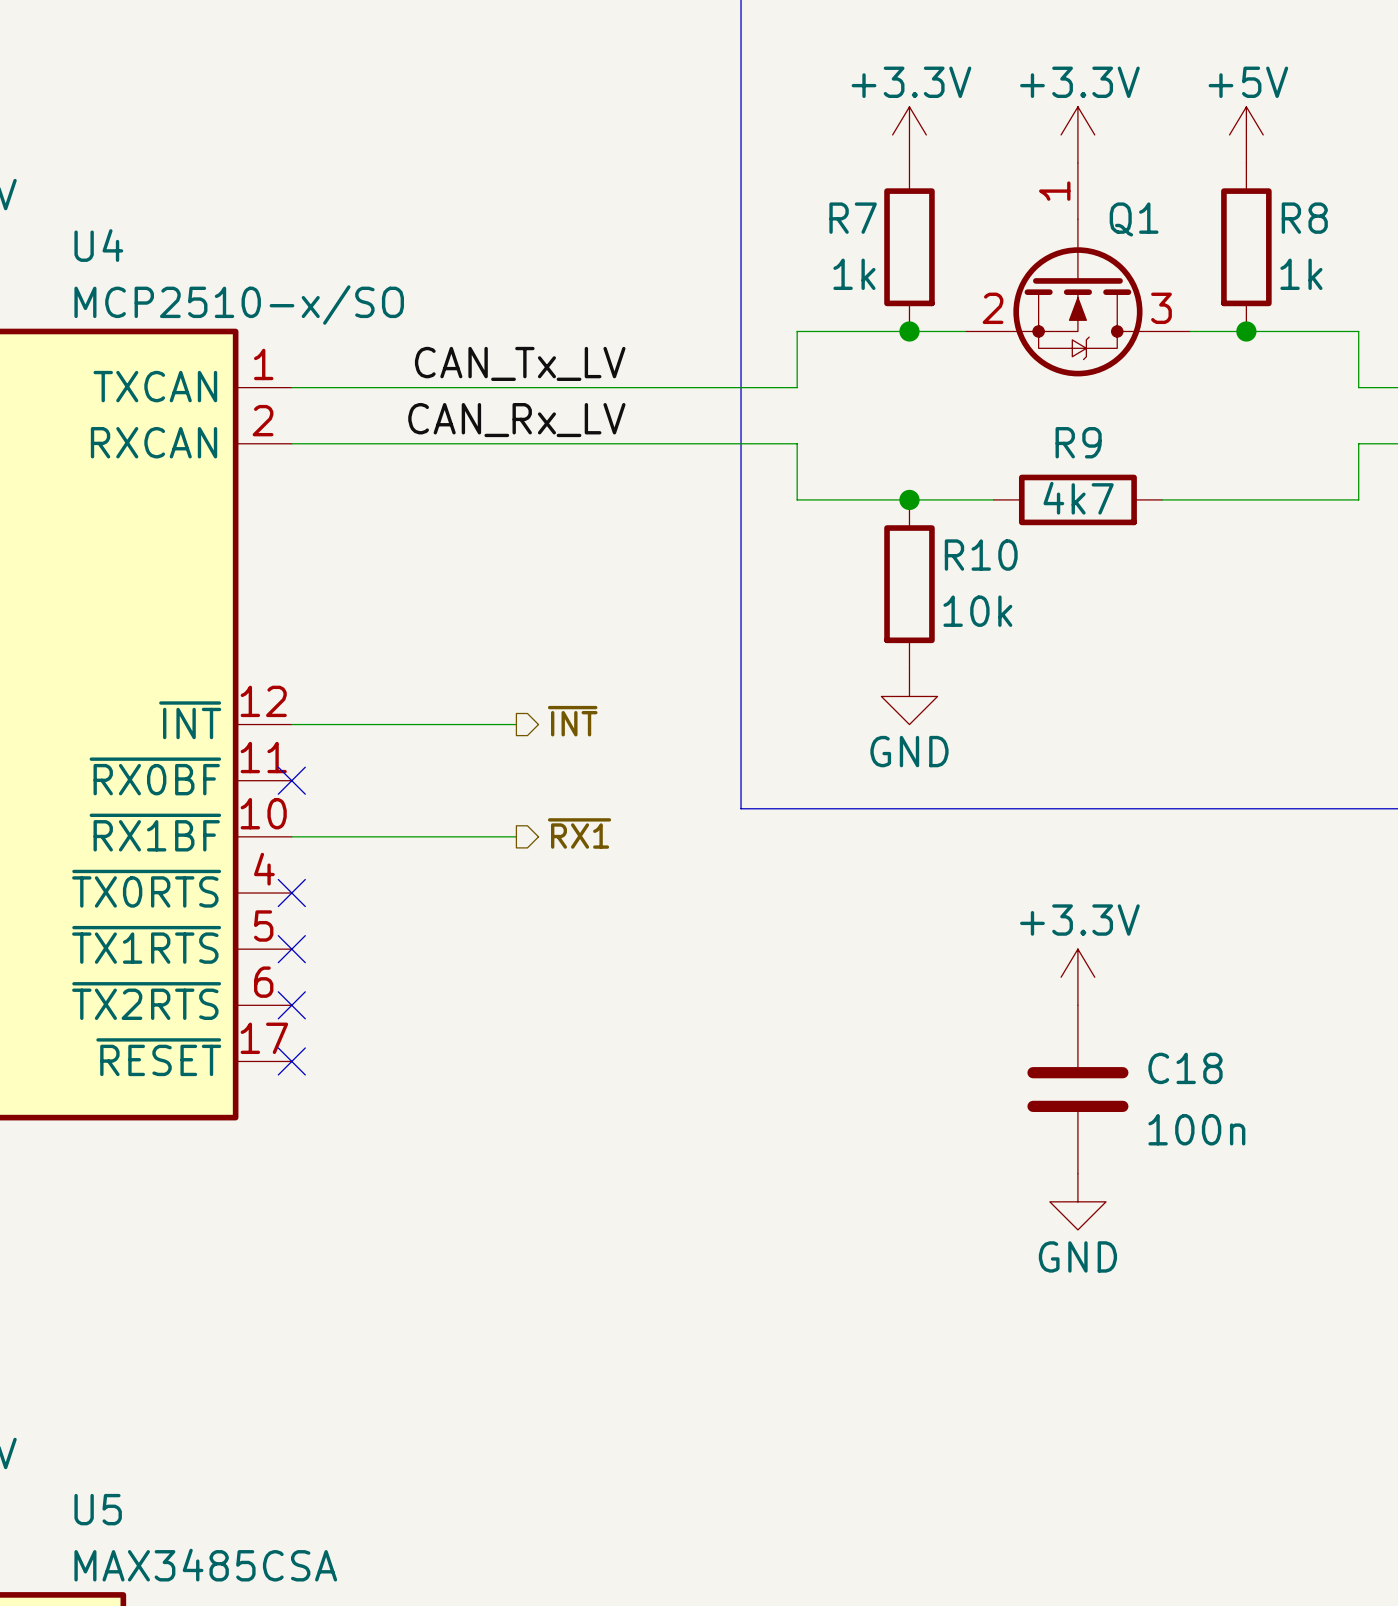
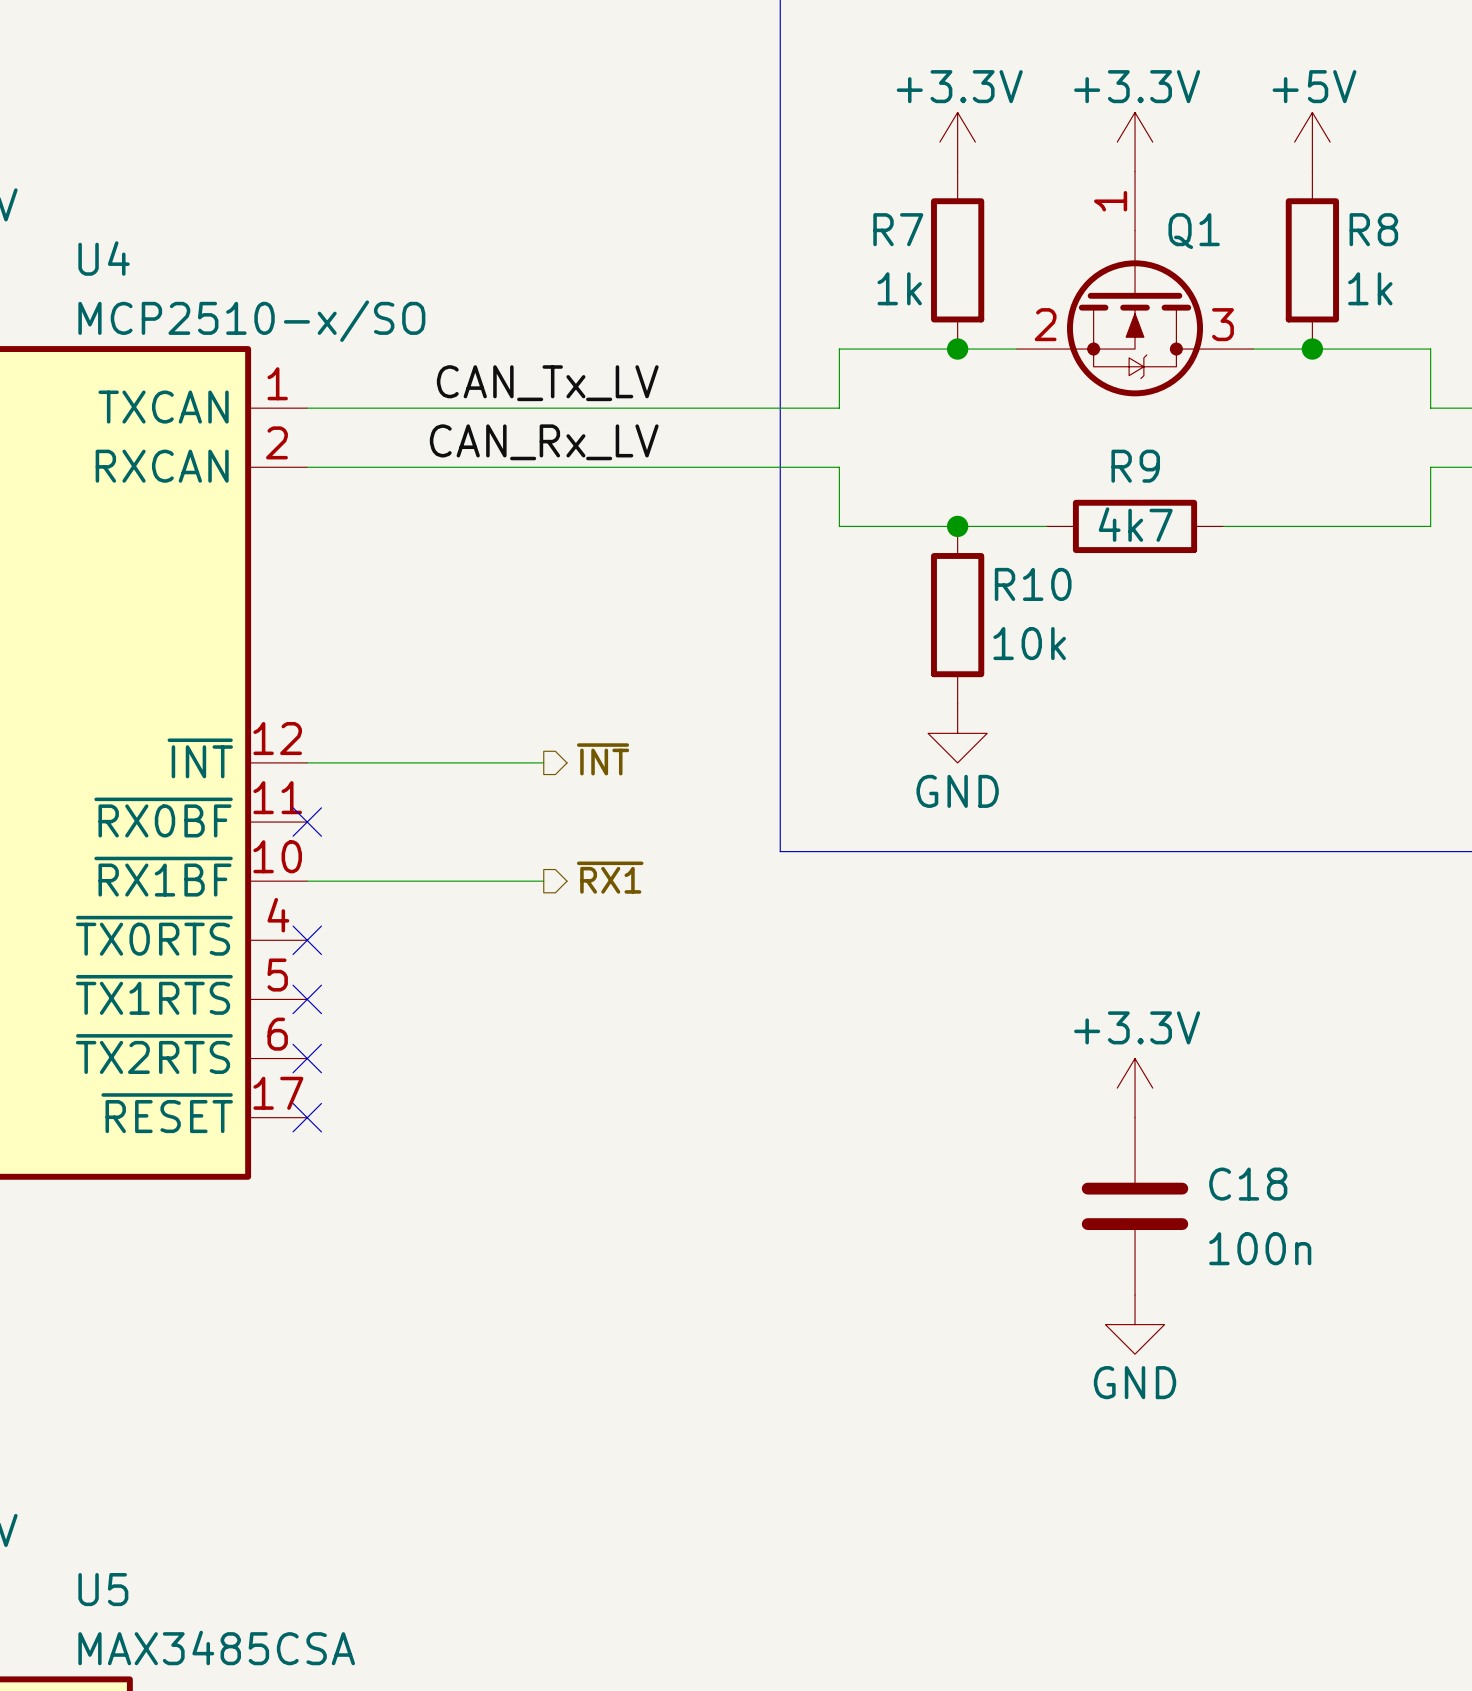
power symbol position: +3.3V (1077, 977) -> +3.3V (1135, 1088)
C18 position: (1077, 1089) -> (1135, 1206)
power symbol position: GND (1077, 1201) -> GND (1135, 1324)

